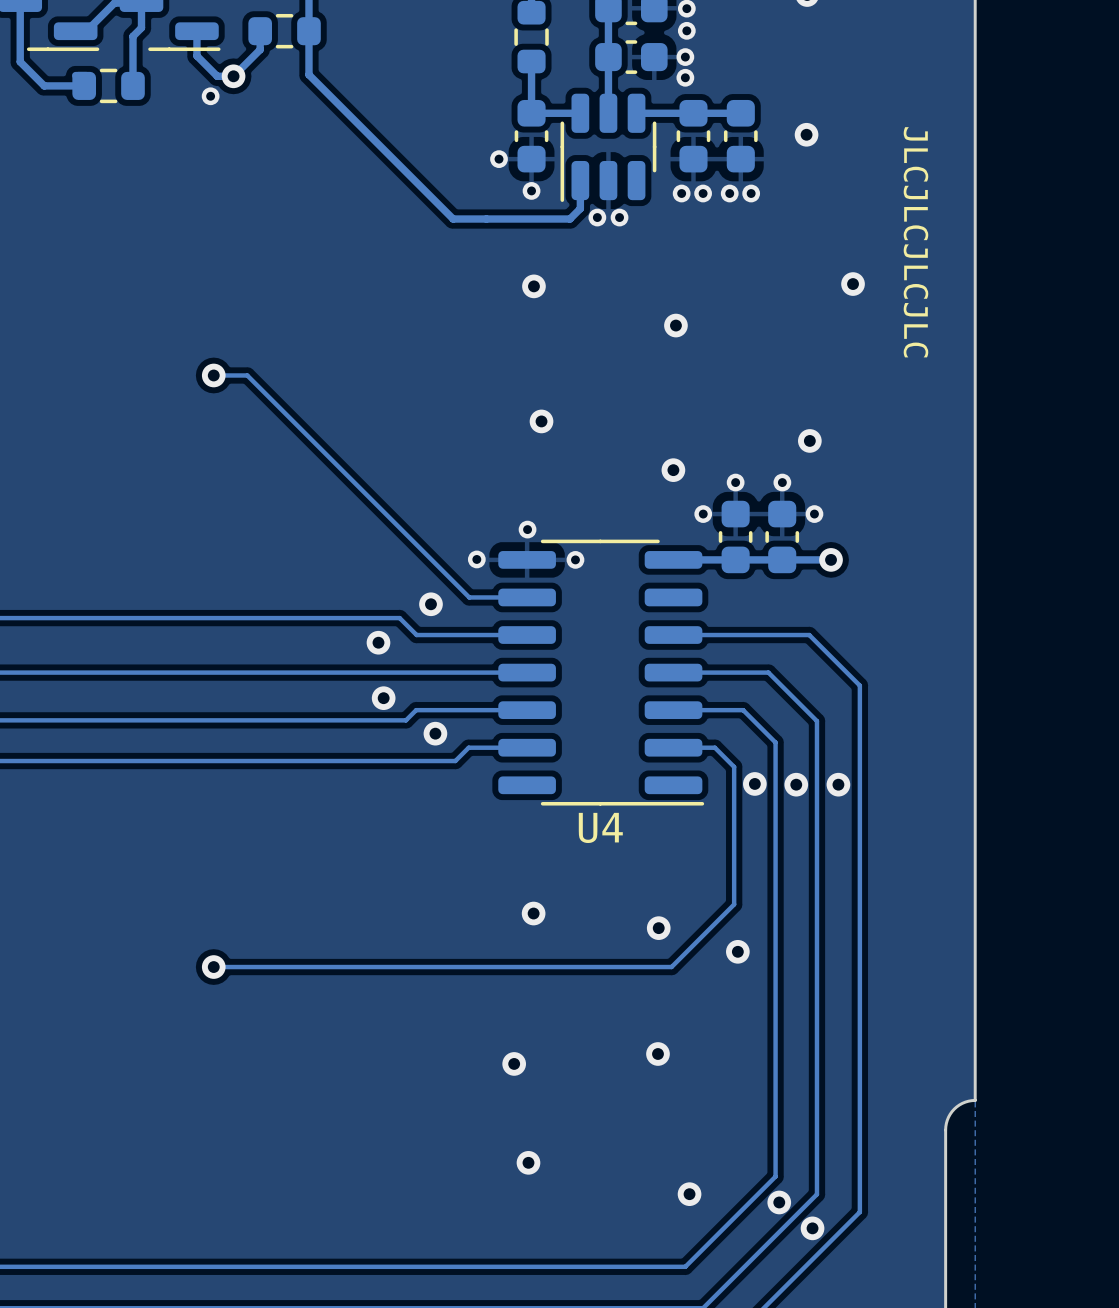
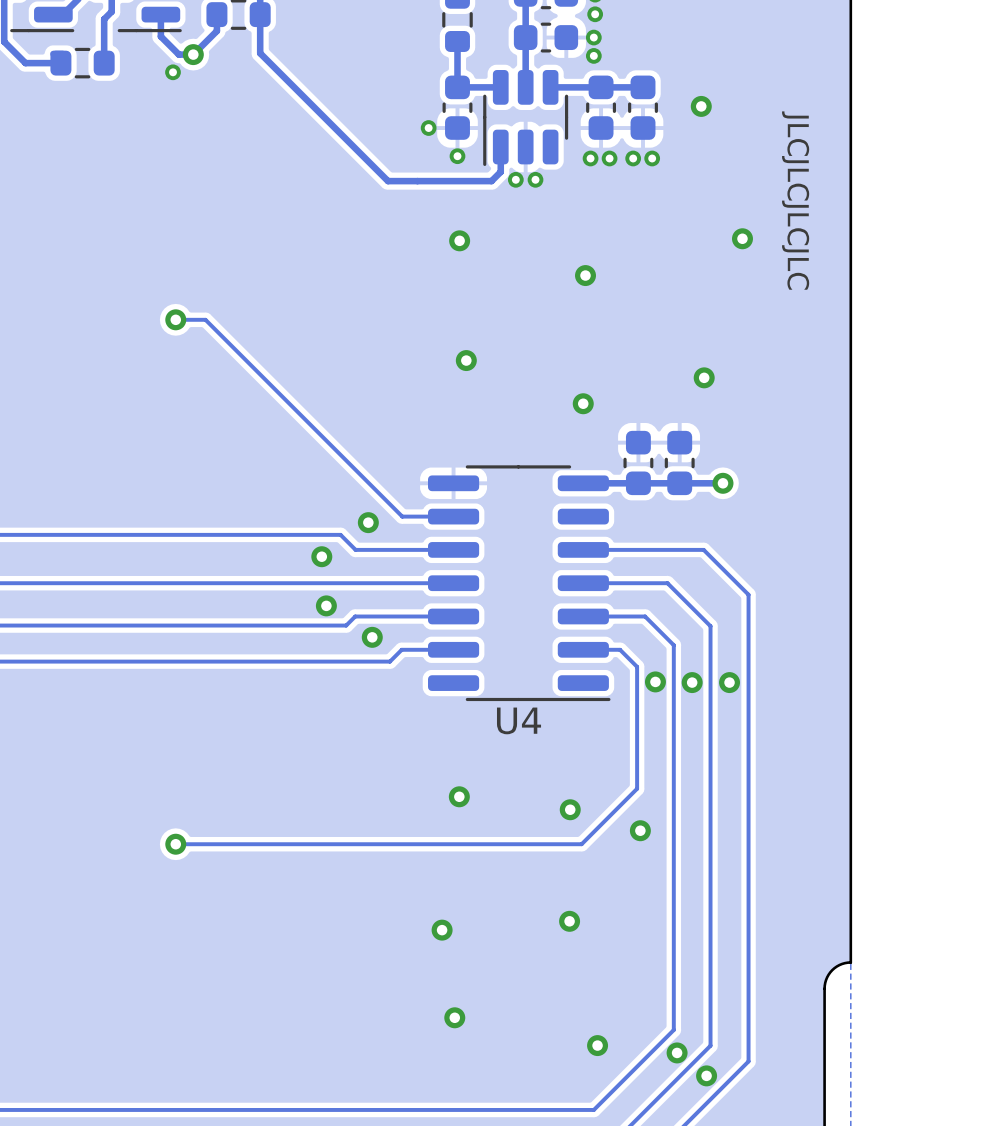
via: (735, 482) -> none
via: (782, 482) -> none
via: (703, 514) -> none
via: (814, 514) -> none
via: (527, 529) -> none
via: (476, 559) -> none
via: (575, 559) -> none

